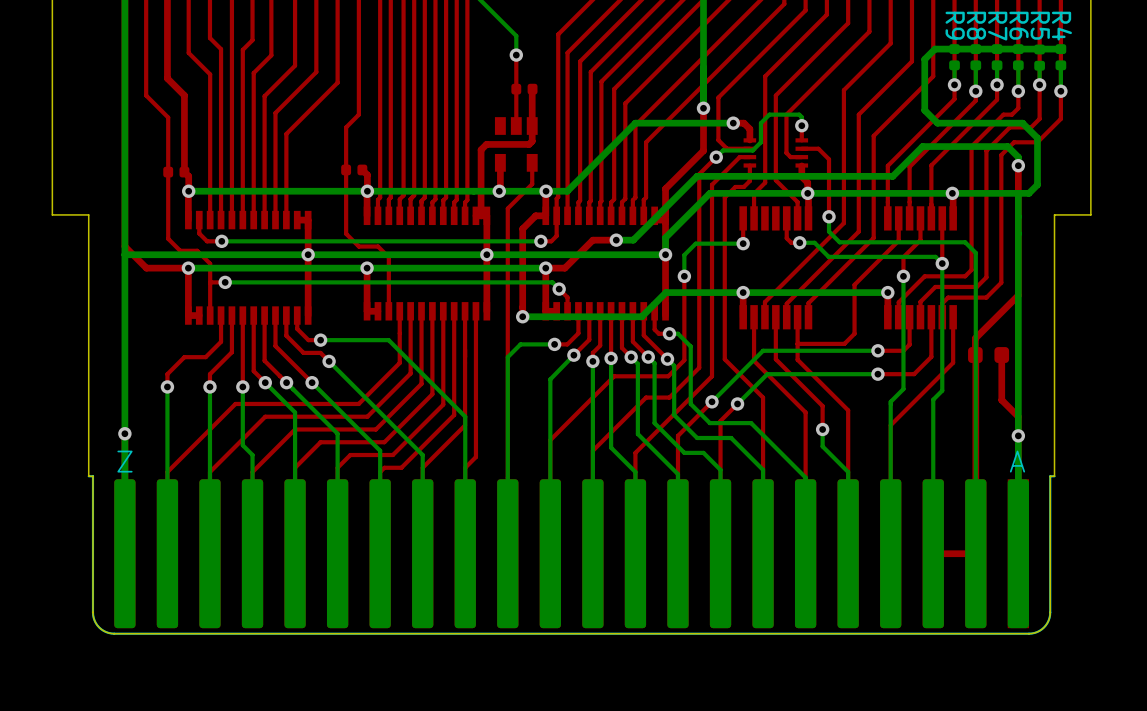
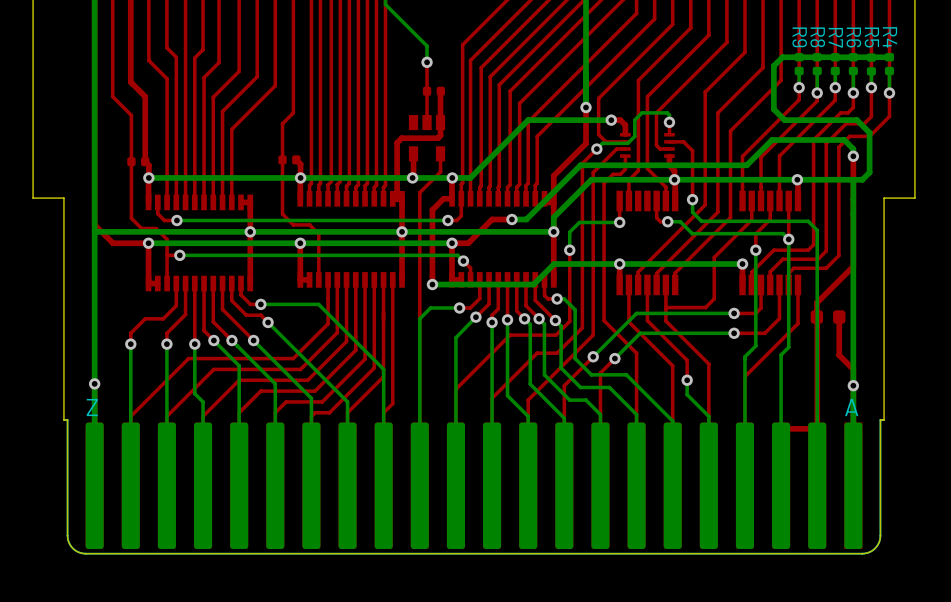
top track: (975, 553) (933, 553) -> (817, 428) (781, 428)

